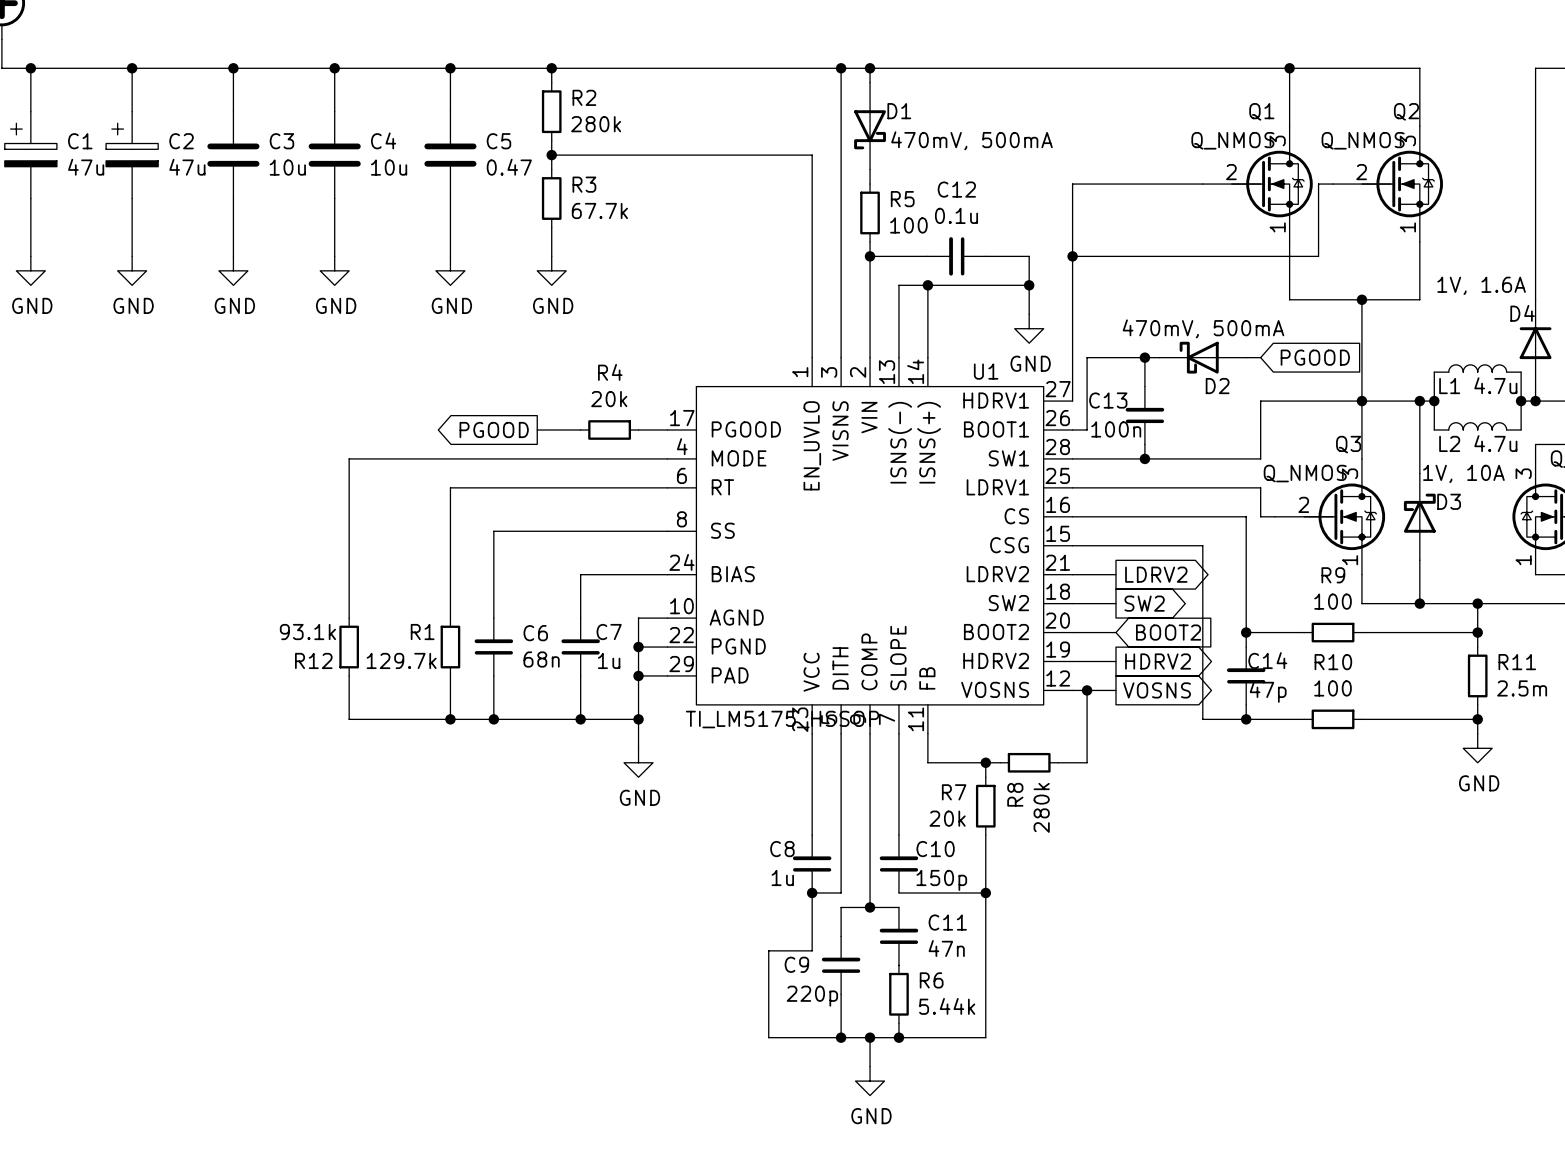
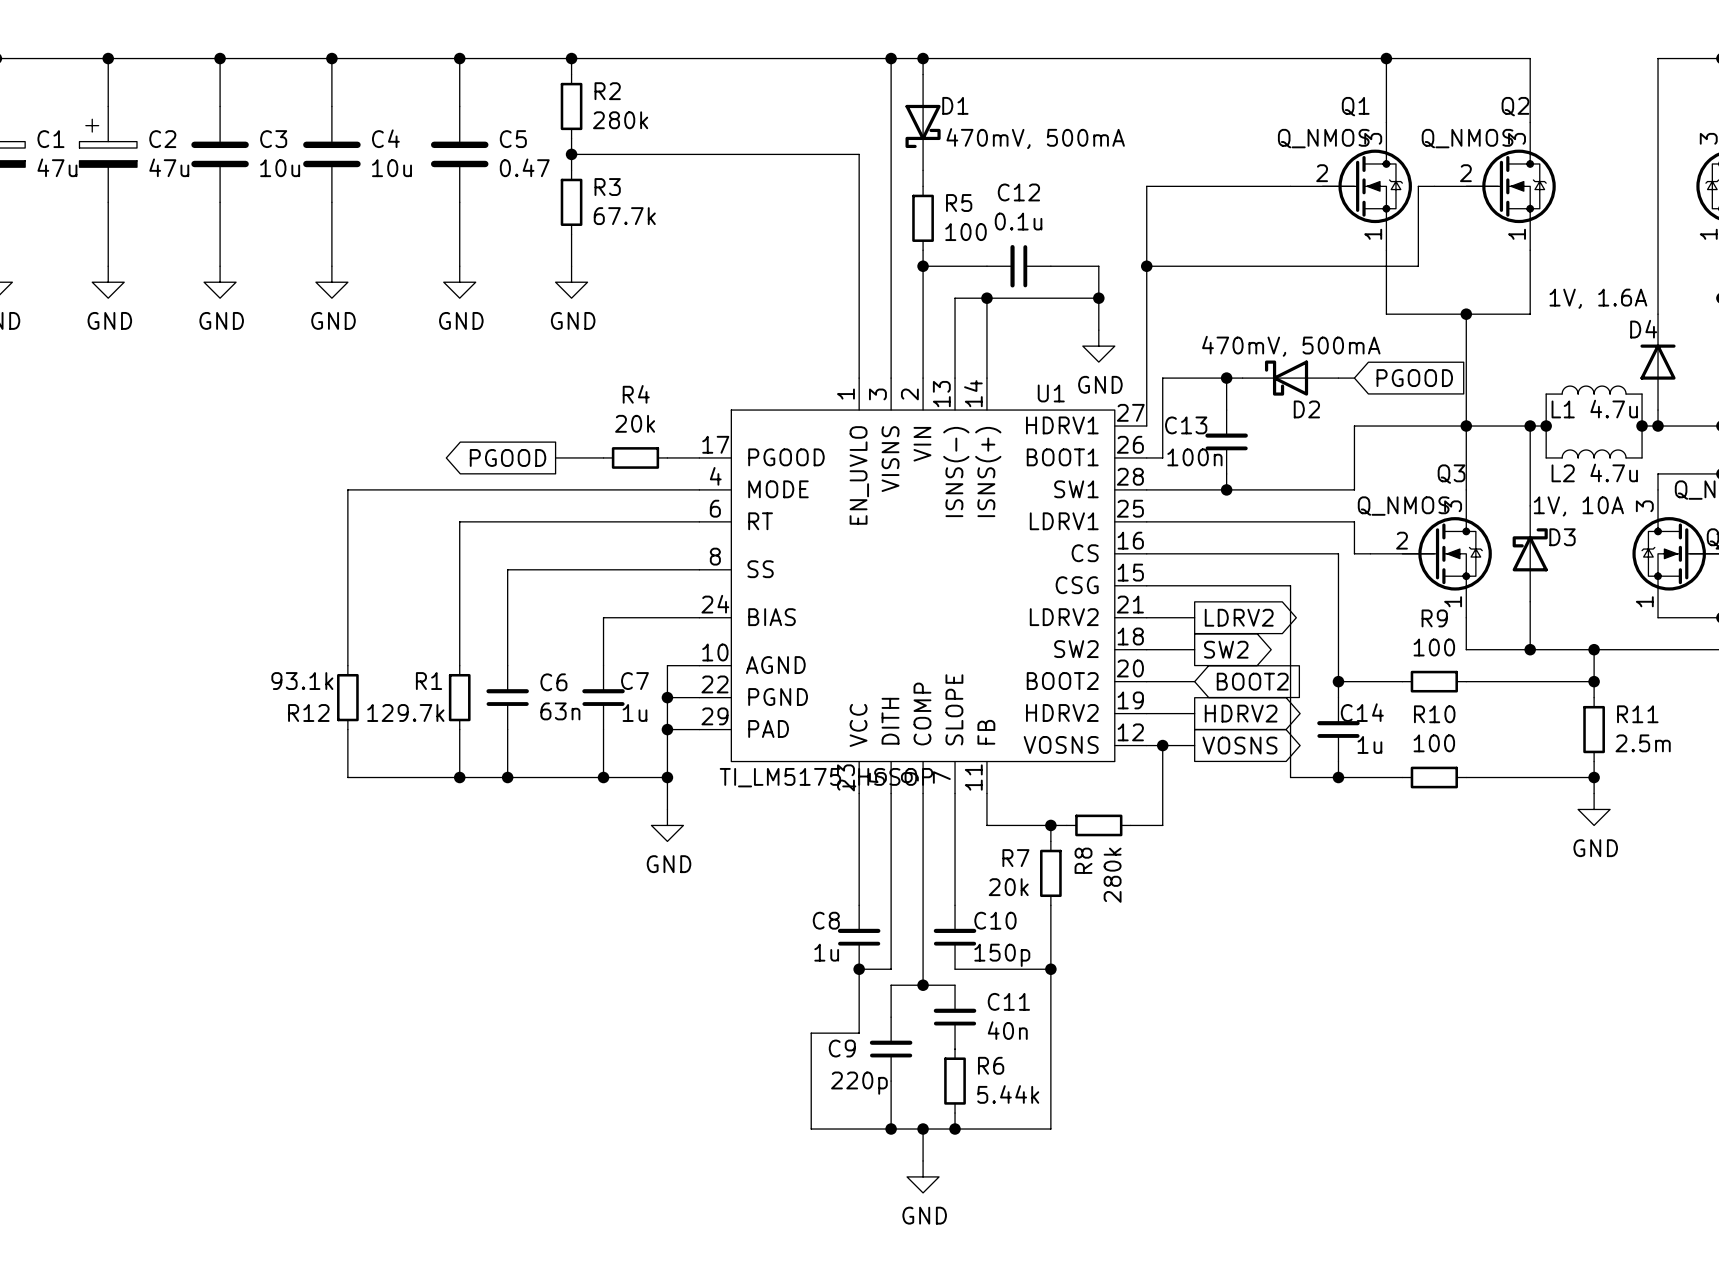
C6 value: 68n (541, 659) -> 63n (560, 711)
C14 value: 47p (1268, 691) -> 1u (1369, 744)
C11 value: 47n (946, 948) -> 40n (1007, 1030)

